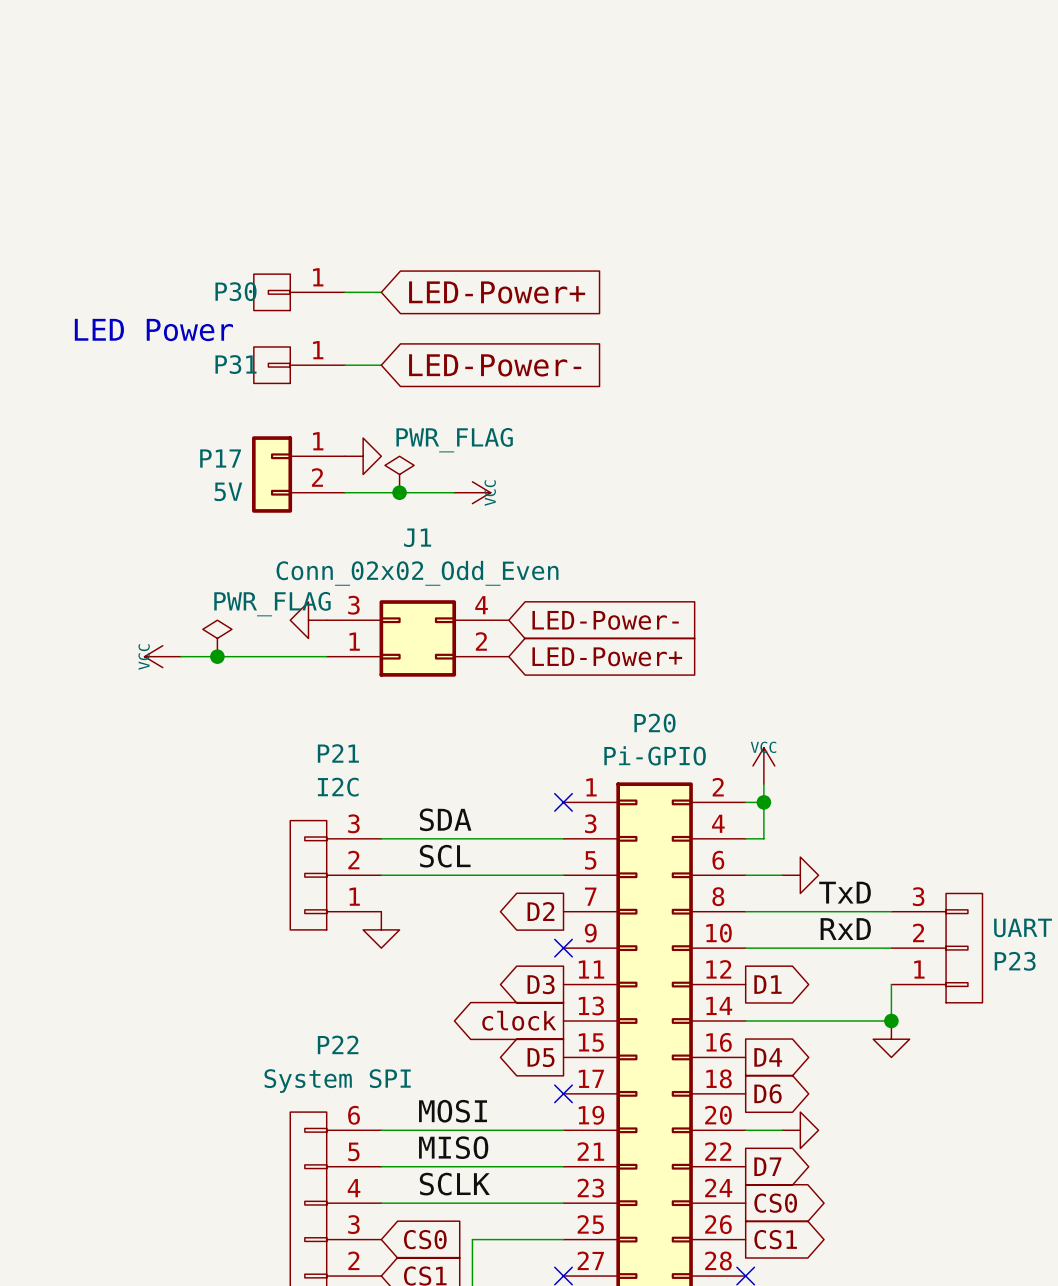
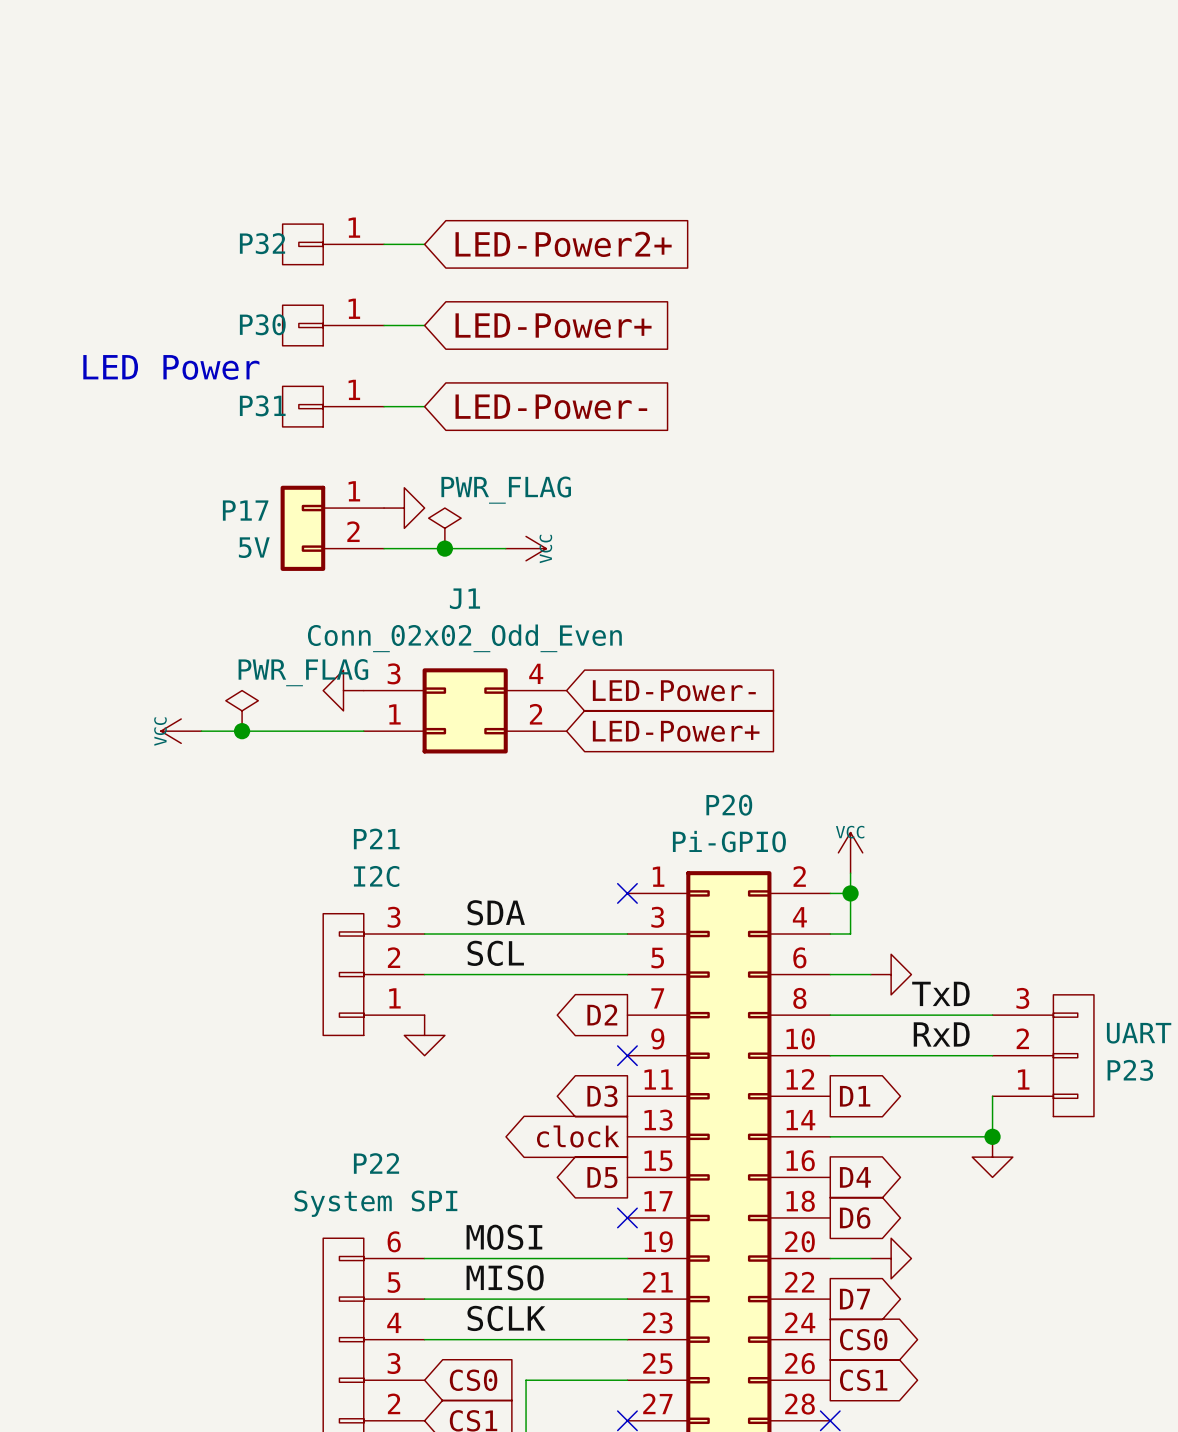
P32: none -> (333, 244)
wire: none -> (384, 244) (424, 244)
global label: none -> LED-Power2+ (563, 244)

